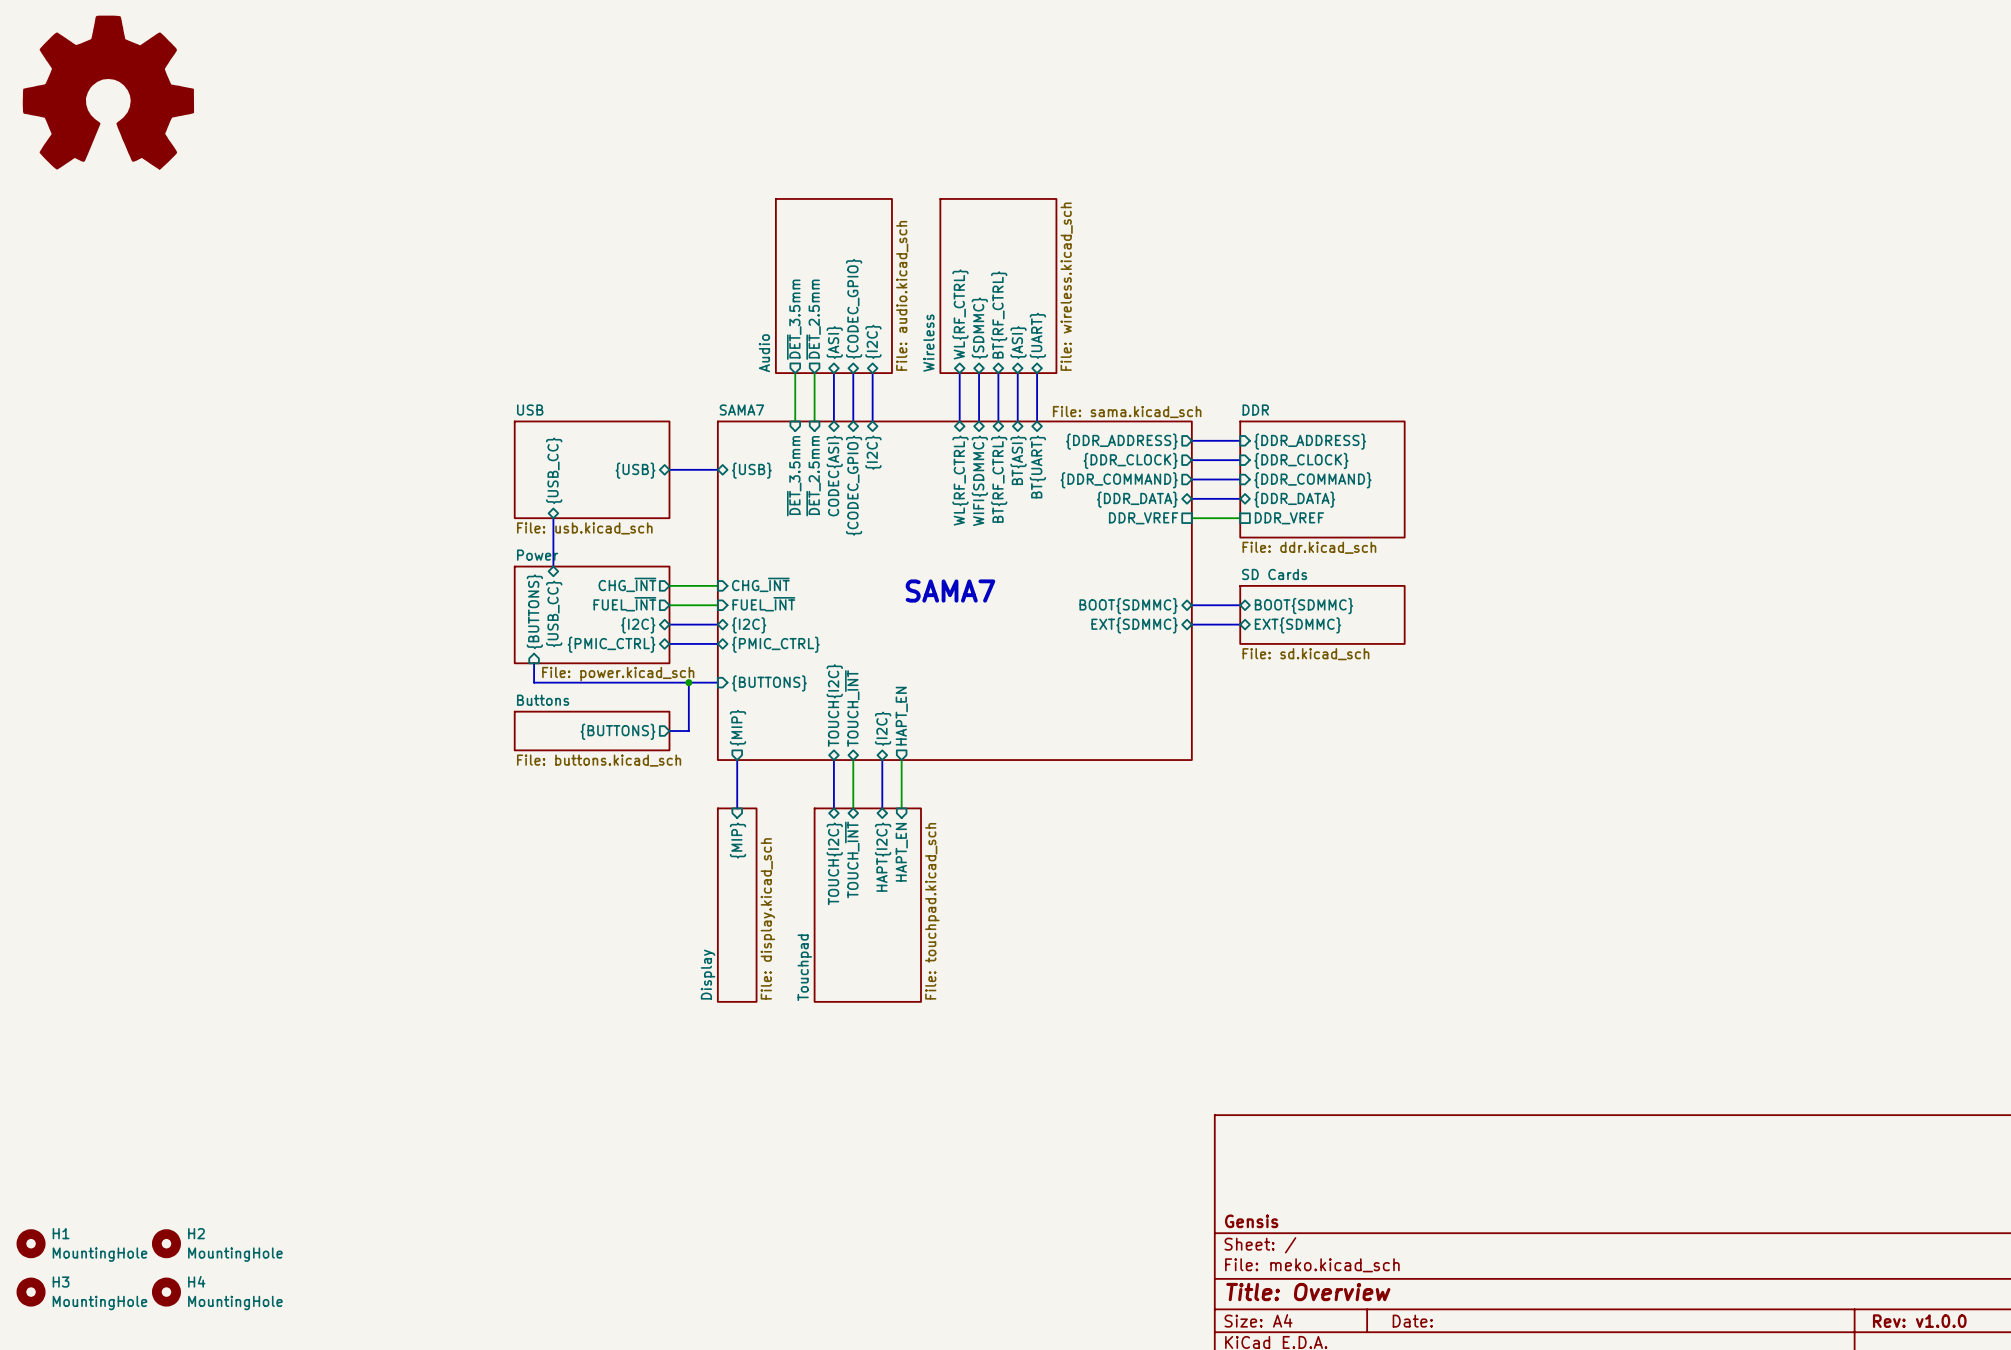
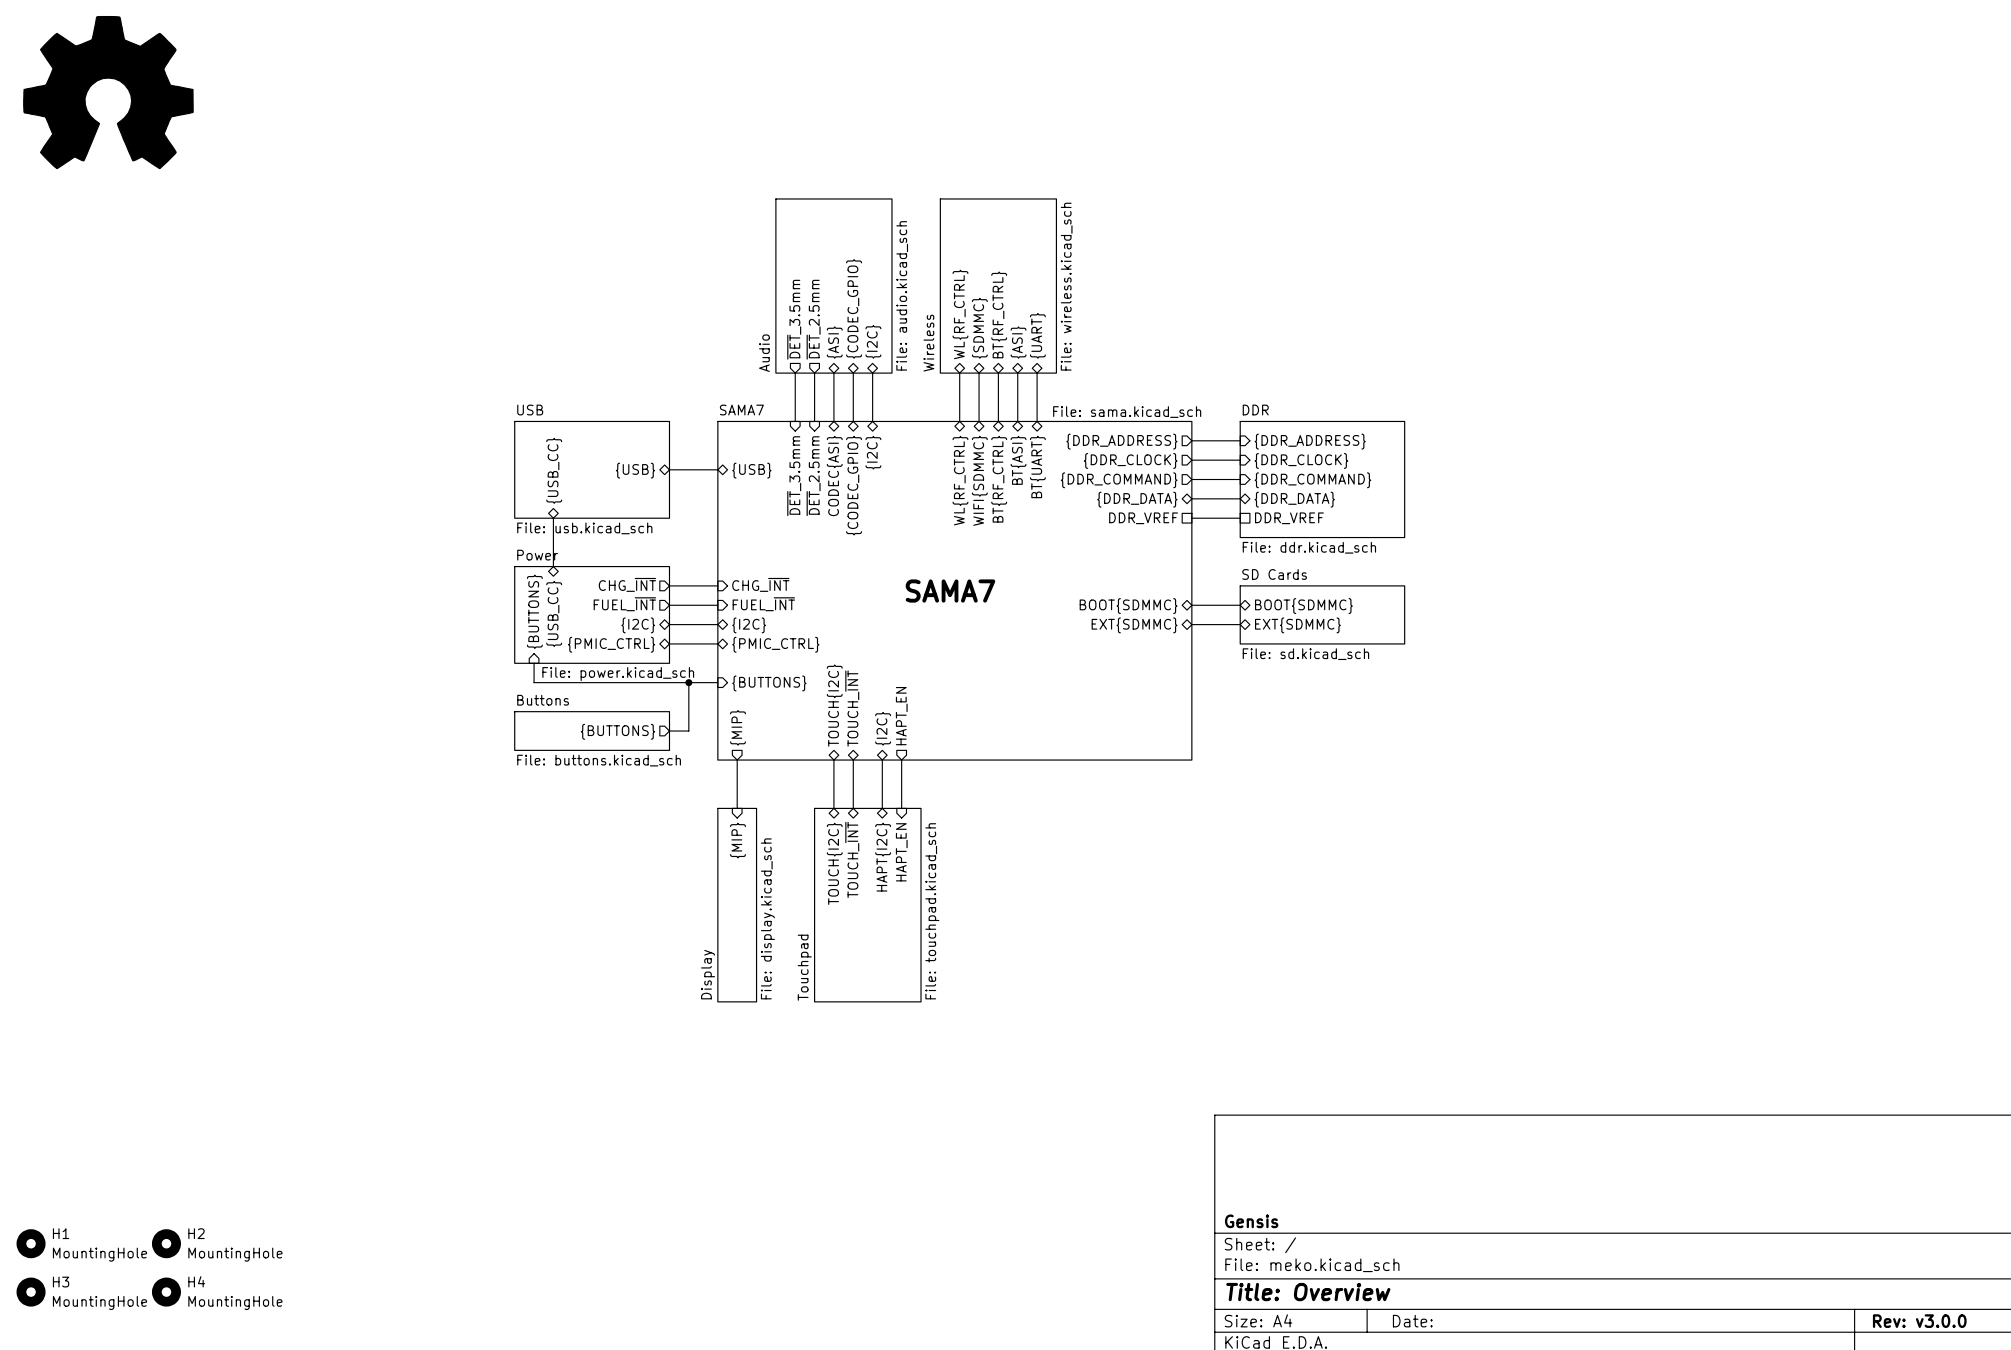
title block: Rev: v1.0.0 (1919, 1321) -> Rev: v3.0.0 (1919, 1321)

